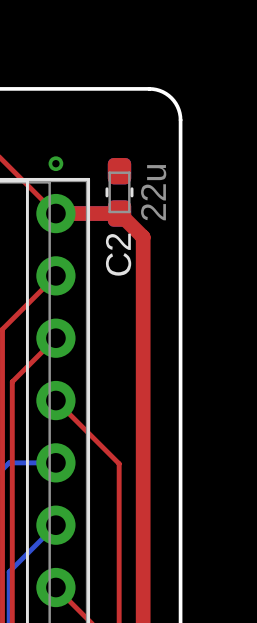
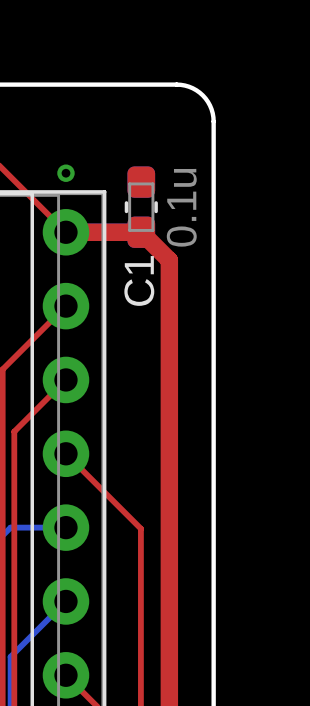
C2 value: 22u (153, 192) -> 0.1u (181, 207)
C2 name: C2 (118, 254) -> C1 (139, 280)

